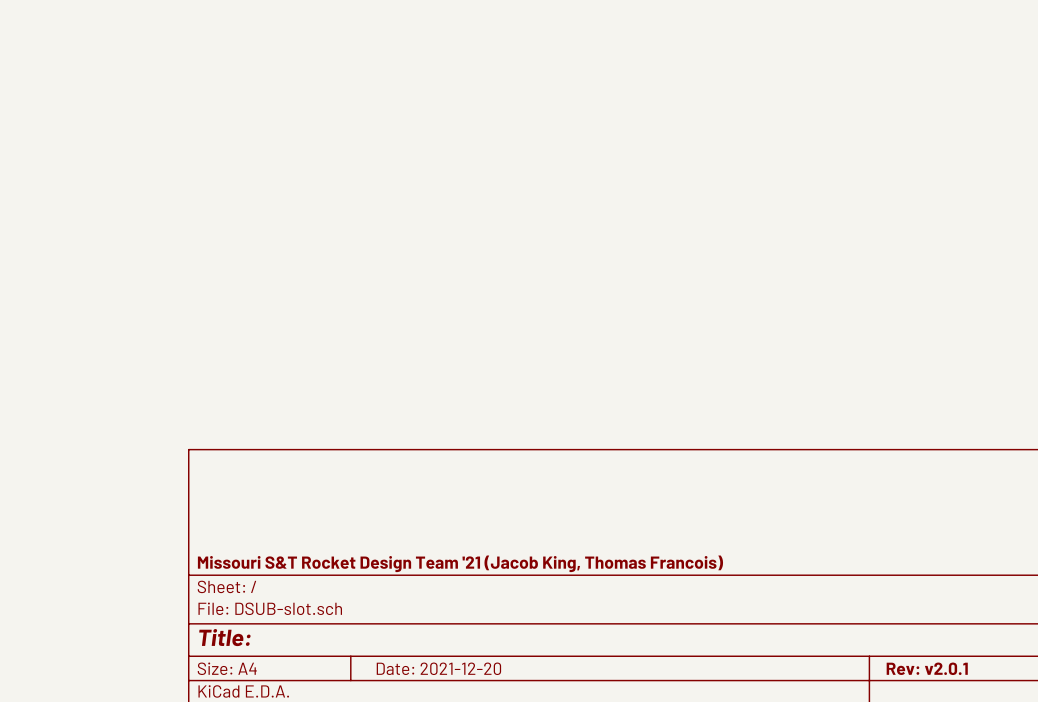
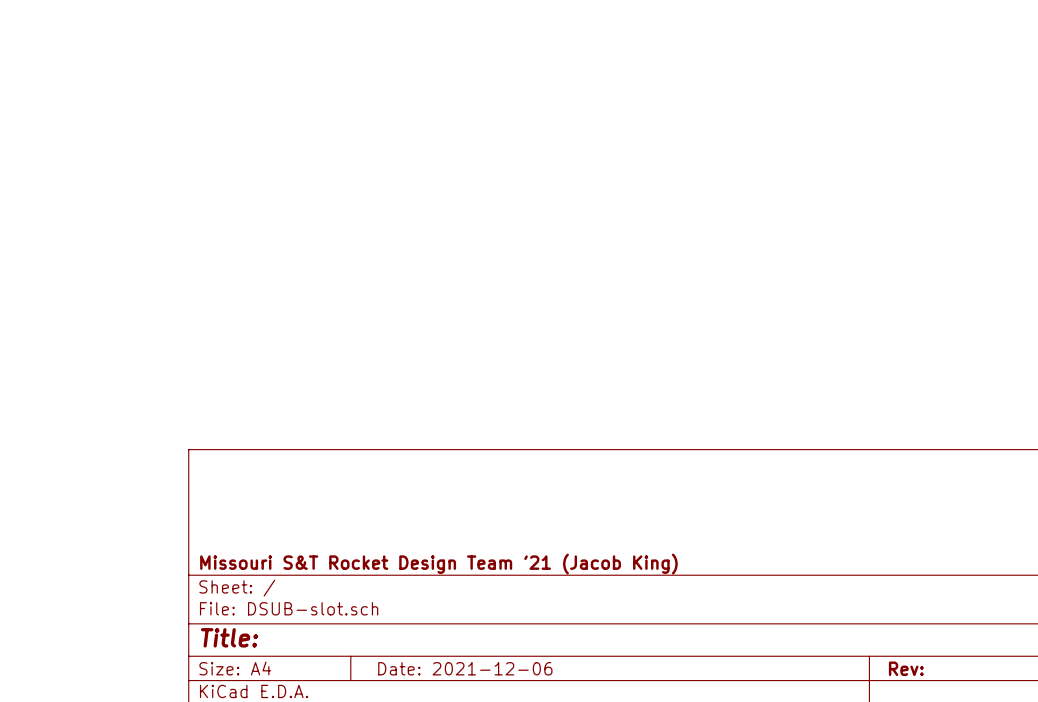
title block: Missouri S&T Rocket Design Team '21 (Jacob King, Thomas Francois) (460, 563) -> Missouri S&T Rocket Design Team '21 (Jacob King) (438, 564)
title block: Date: 2021-12-20 (438, 668) -> Date: 2021-12-06 (465, 668)
title block: Rev: v2.0.1 (927, 668) -> Rev: (906, 668)

